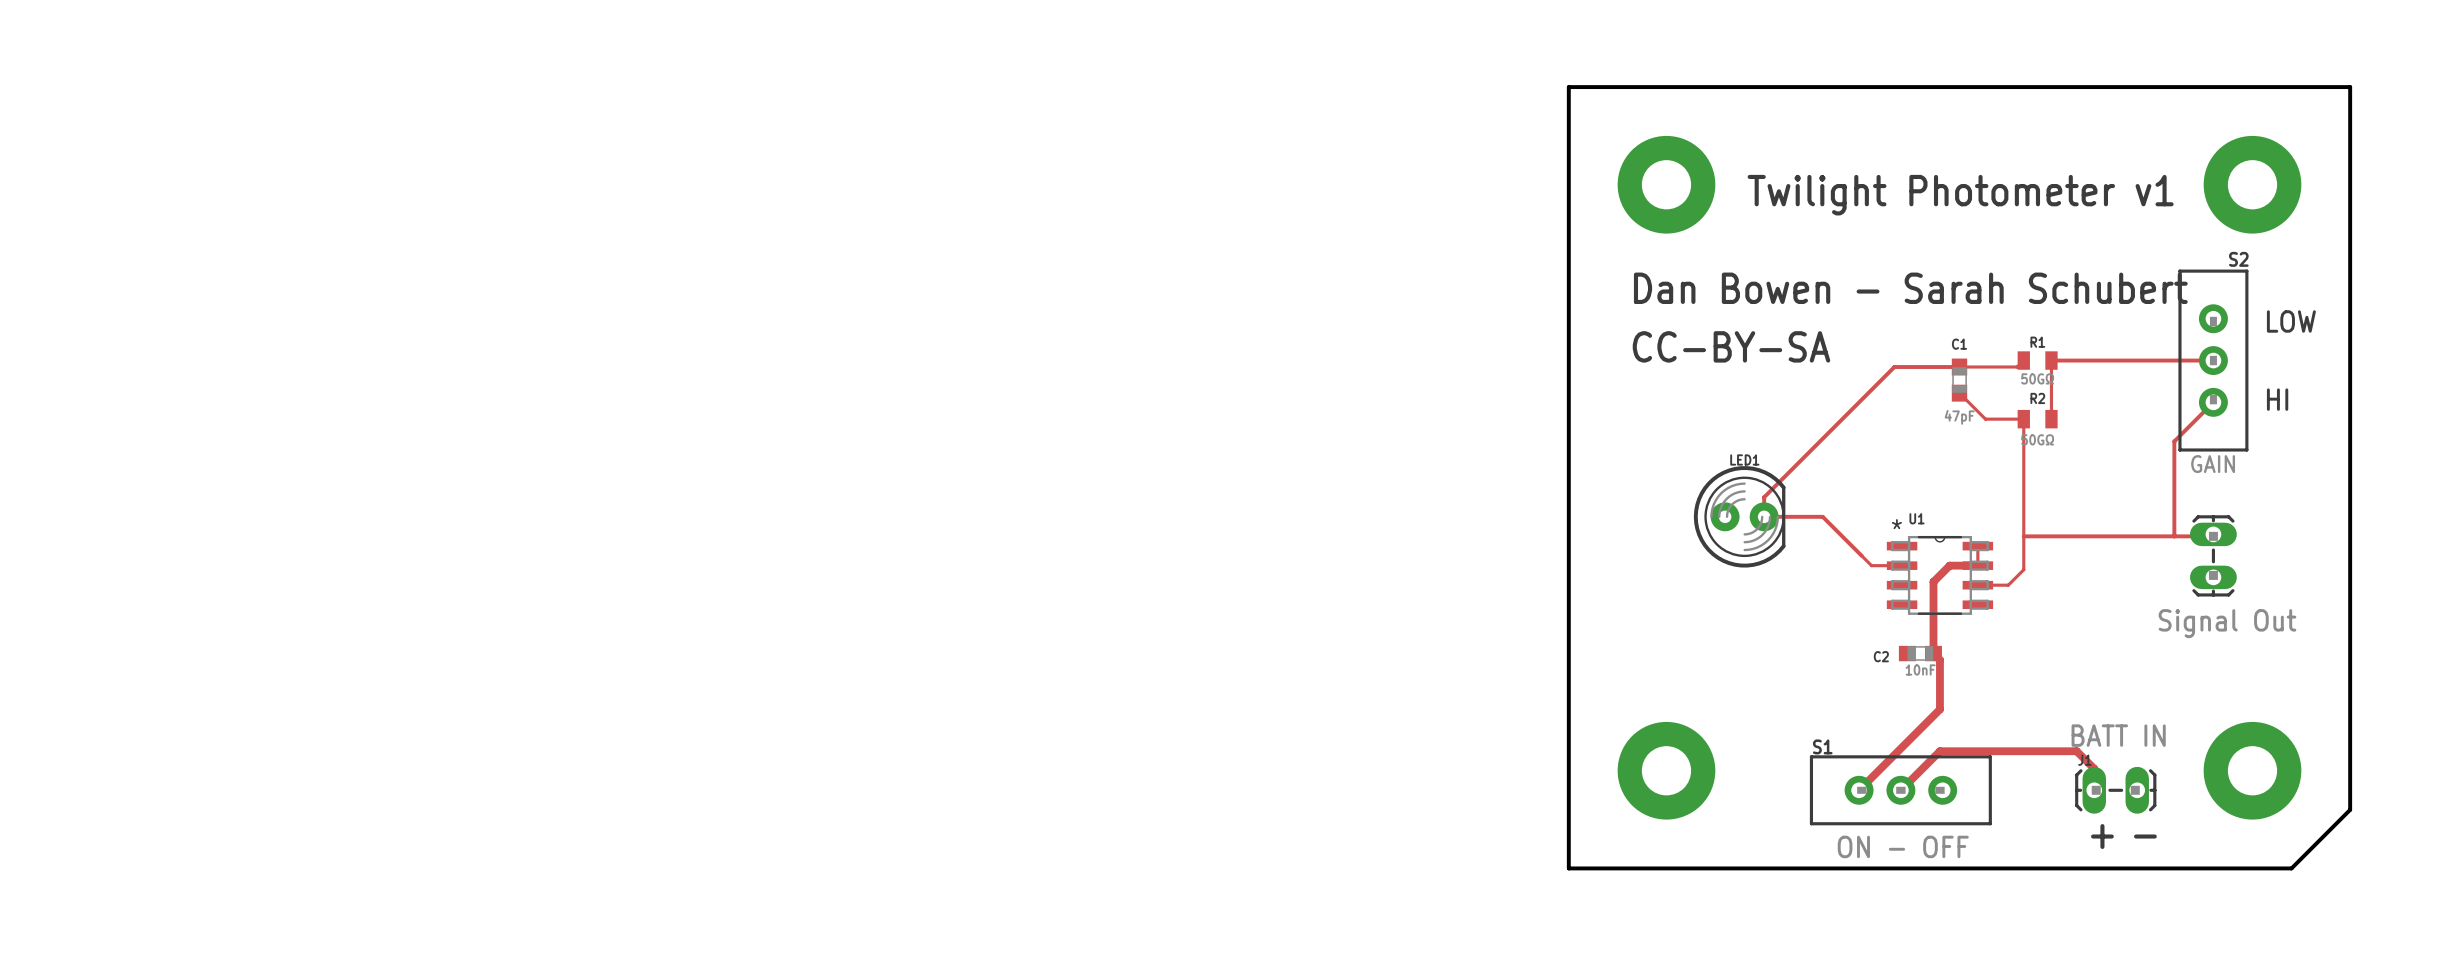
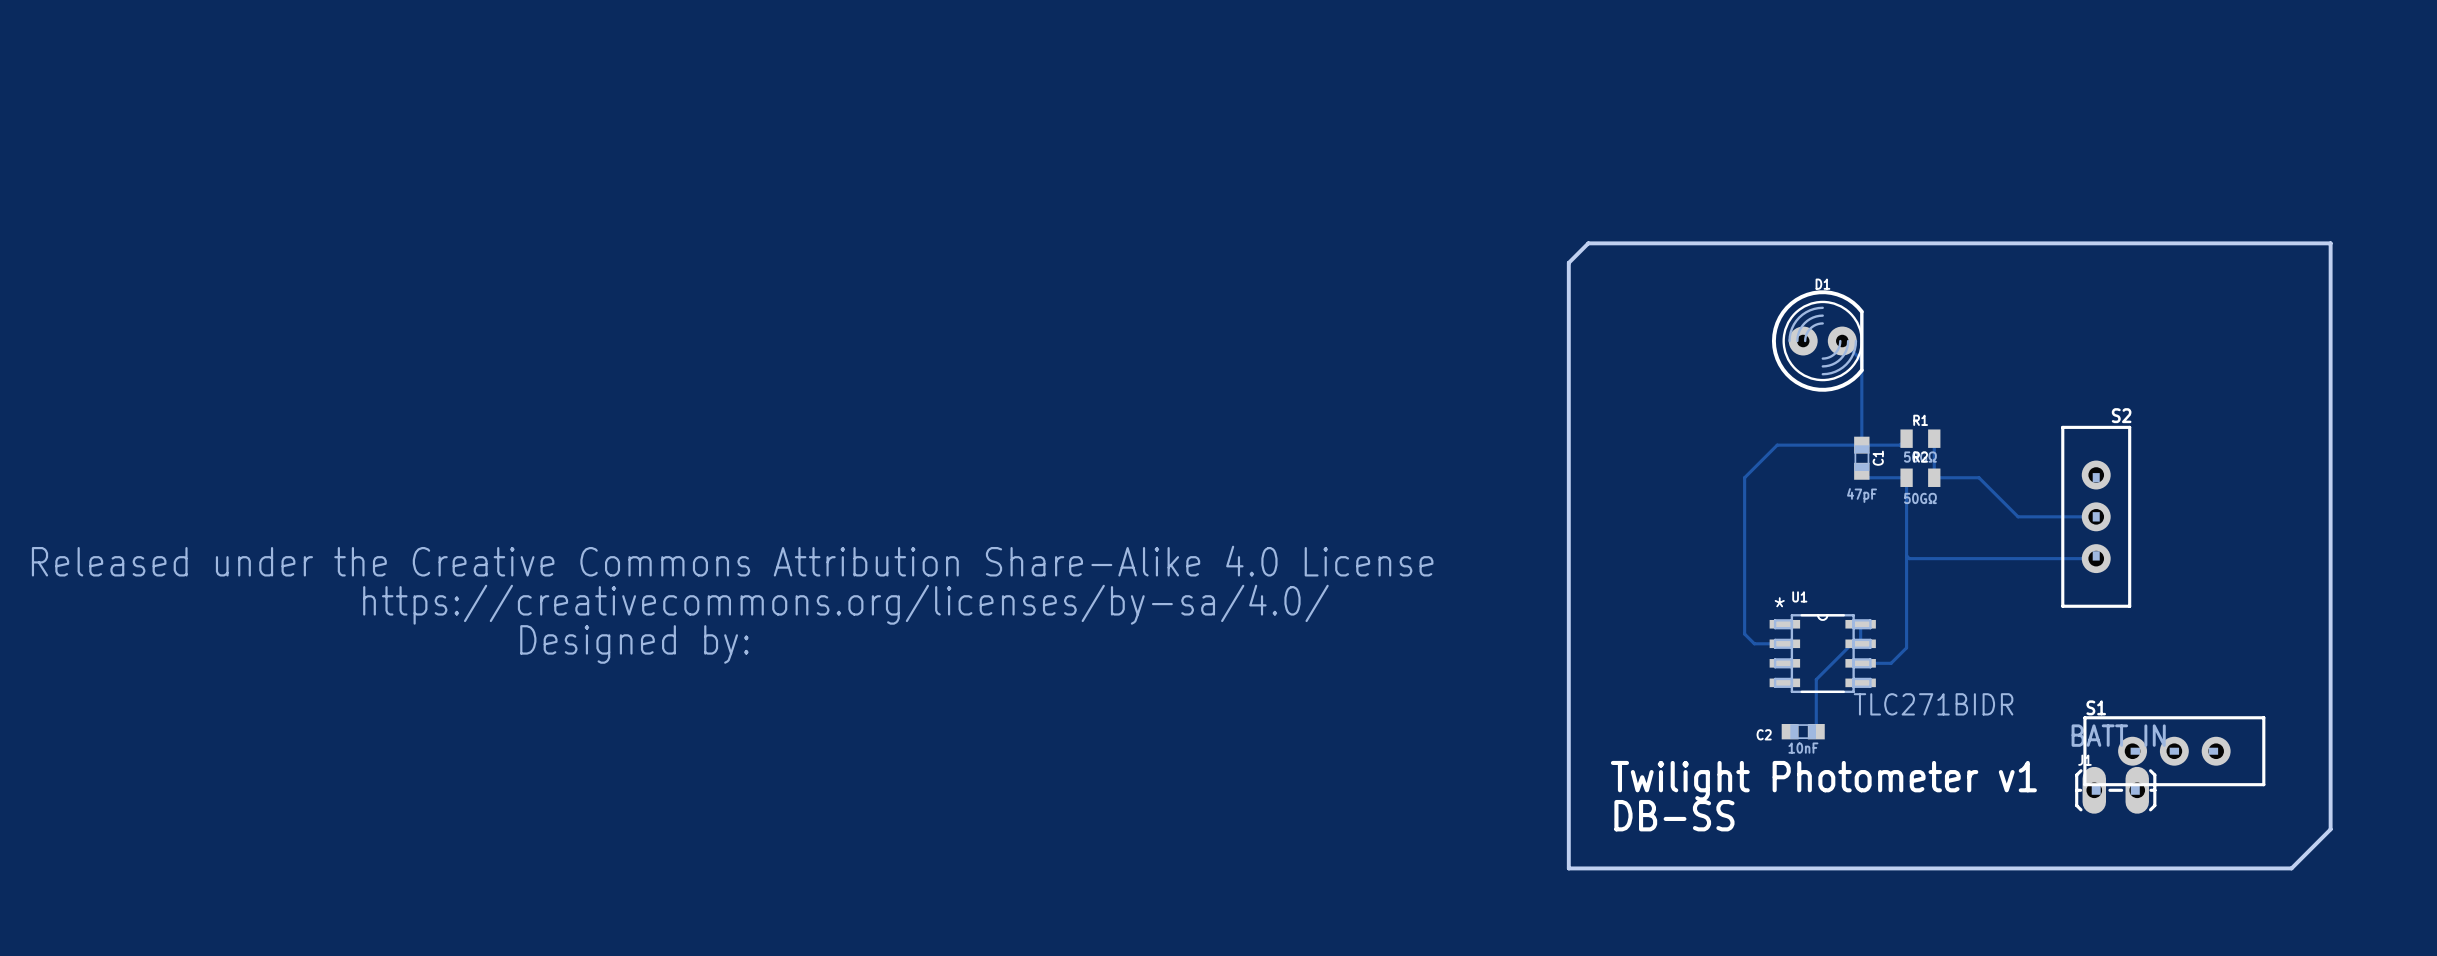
part: (1666, 184) -> none
part: (2252, 184) -> none
text: Twilight Photometer v1 (1960, 195) -> none
board edge: (1568, 262) (1568, 87) (2350, 87) (2350, 809) (2330, 829) -> (1568, 262) (1588, 243) (2330, 243) (2330, 829)
text: Dan Bowen - Sarah Schubert (1910, 288) -> none
text: LOW (2291, 321) -> none
D1: none -> (1817, 341)
track: none -> (1842, 341) (1861, 360) (1861, 445)
C1 name rotation: 0° (1959, 344) -> 90° counterclockwise (1878, 458)
C1 name position: C1 (1959, 344) -> C1 (1878, 458)
text: CC-BY-SA (1731, 346) -> none
track: (2023, 360) (2017, 367) (1894, 367) (1764, 497) (1764, 516) (1822, 516) (1871, 565) (1902, 565) -> none
R1 position: (2037, 360) -> (1920, 438)
track: (2213, 360) (2051, 360) (2051, 419) -> none
S2 position: (2213, 360) -> (2096, 516)
C1 position: (1959, 380) -> (1861, 458)
track: (1959, 393) (1985, 419) (2023, 419) (2023, 569) (2008, 585) (1977, 585) -> none
text: HI (2277, 399) -> none
track: (2213, 402) (2174, 441) (2174, 536) -> none
R2 position: (2037, 419) -> (1920, 477)
track: none -> (1906, 438) (1900, 445) (1777, 445) (1744, 477) (1744, 634) (1754, 643) (1784, 643)
track: none -> (1934, 438) (1934, 477) (1979, 477) (2018, 516) (2096, 516)
S2 value: GAIN (2213, 464) -> none
track: none -> (1861, 471) (1868, 477) (1906, 477) (1906, 647) (1891, 663) (1860, 663)
LED1: (1739, 516) -> none
track: (2213, 534) (2211, 536) (2023, 536) -> none
drawing: none -> [31, 545, 1434, 664]
track: (1977, 546) (1977, 565) (1949, 565) (1933, 581) (1933, 653) (1939, 660) (1939, 709) (1859, 790) -> none
track: none -> (1906, 555) (1909, 558) (2096, 558)
part: Signal Out (2213, 555) -> none
U1 position: (1939, 575) -> (1822, 653)
track: none -> (1860, 624) (1860, 643) (1852, 643) (1816, 679) (1816, 731)
C2 position: (1920, 653) -> (1803, 731)
U1 value: none -> TLC271BIDR (1933, 704)
part: (1666, 770) -> none
part: (2252, 770) -> none
text: none -> Twilight Photometer v1 (1823, 781)
track: (1900, 790) (1939, 751) (2076, 751) (2094, 768) (2094, 790) -> none
S1 position: (1900, 790) -> (2174, 751)
text: none -> DB-SS (1674, 815)
text: + (2102, 836) -> none
text: - (2145, 836) -> none
S1 value: ON - OFF (1903, 846) -> none

